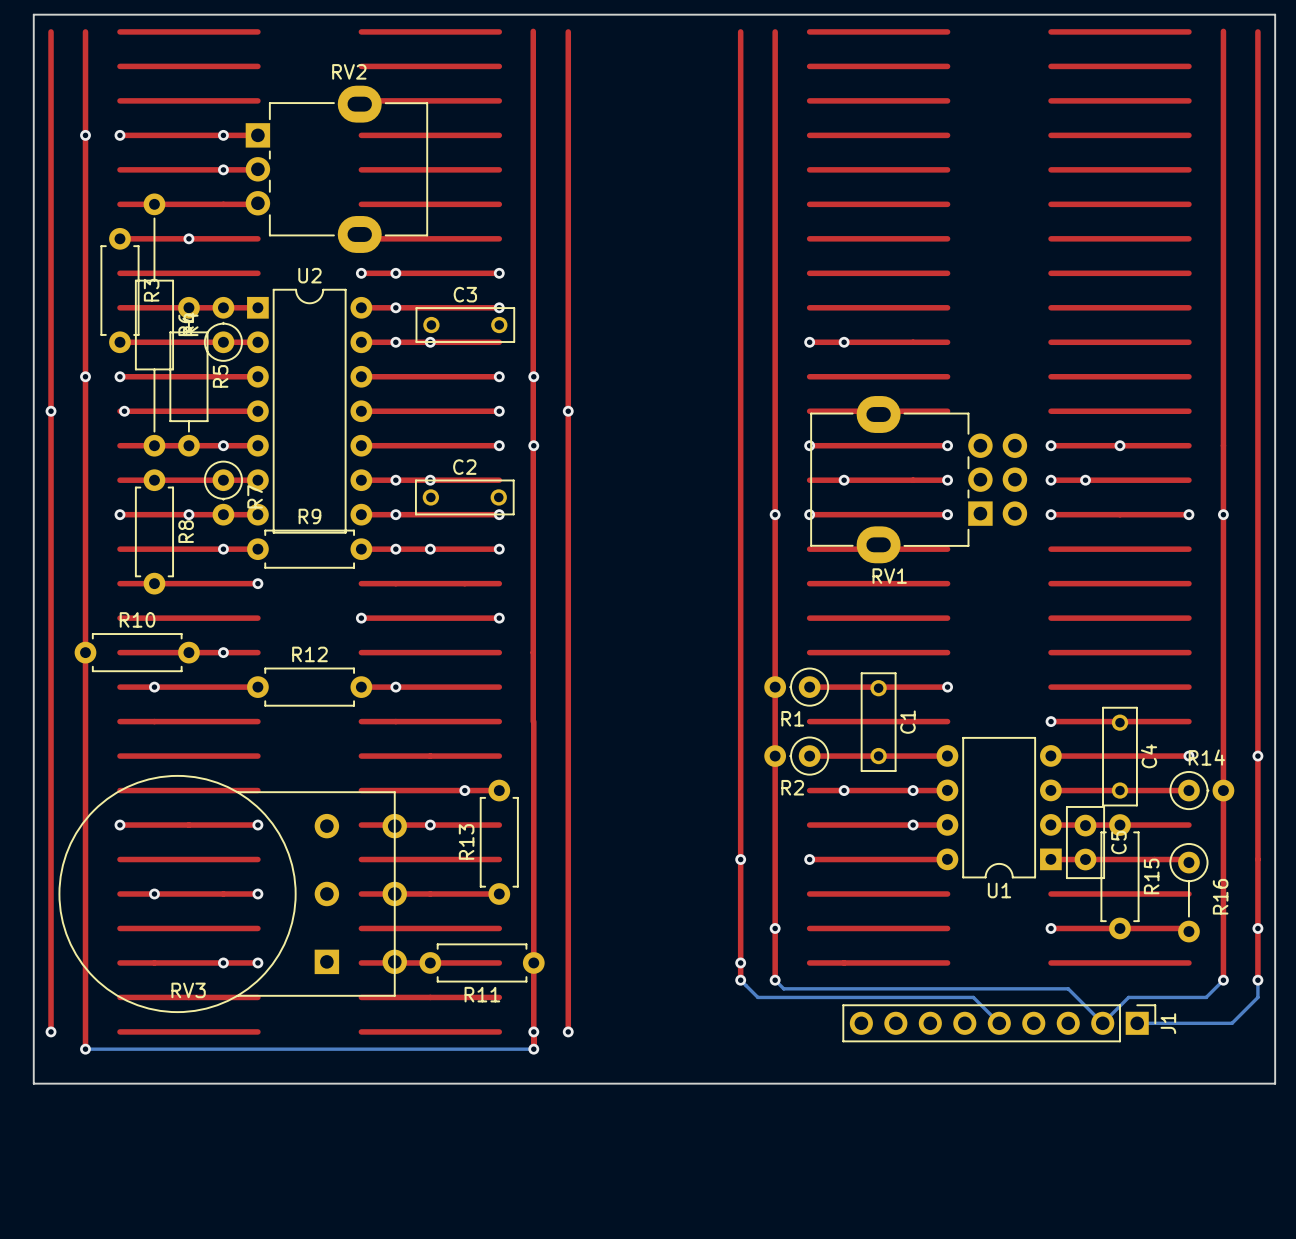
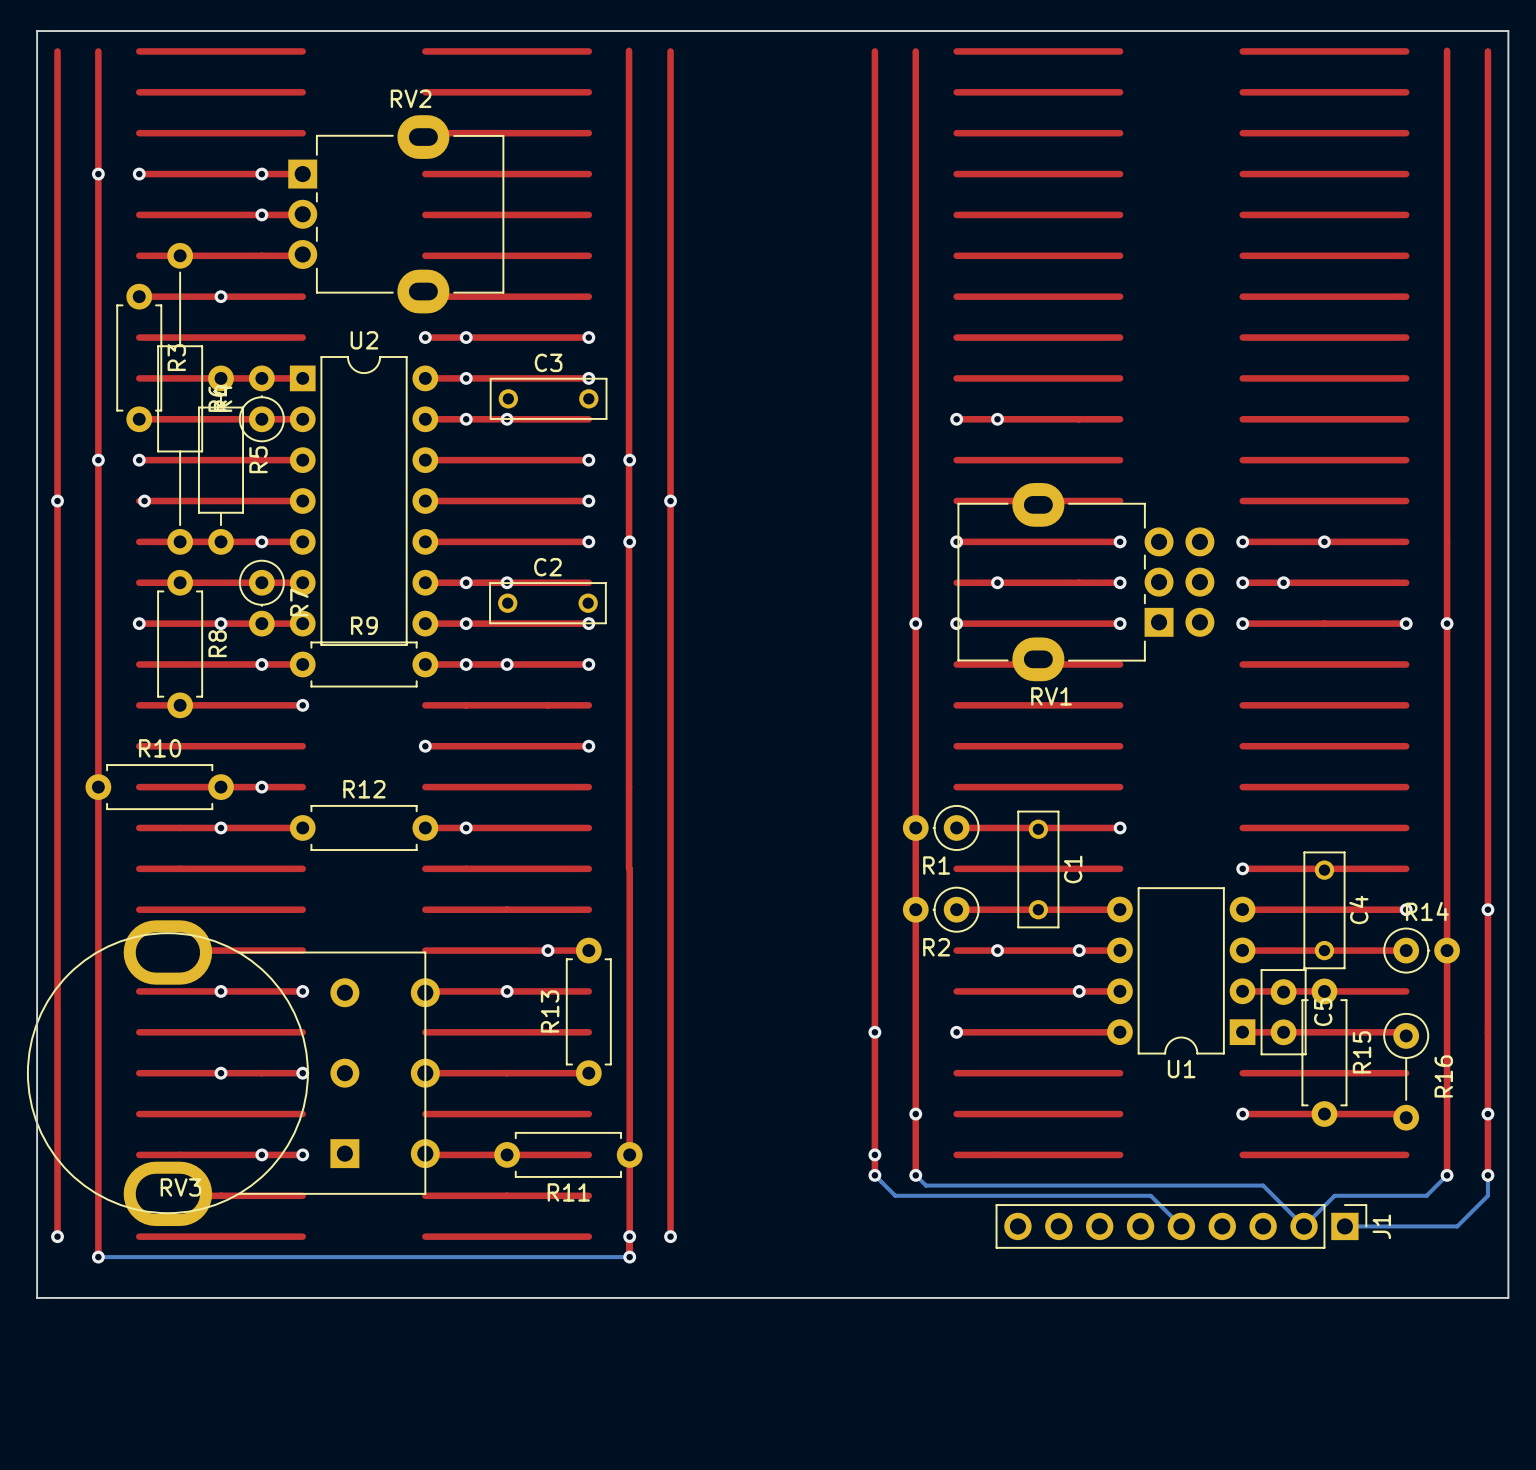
via position: (154, 687) -> (220, 827)
RV3 footprint: [58, 775, 407, 1013] -> [26, 920, 440, 1227]
via: (119, 825) -> none
via: none -> (220, 991)
via position: (154, 894) -> (220, 1073)

